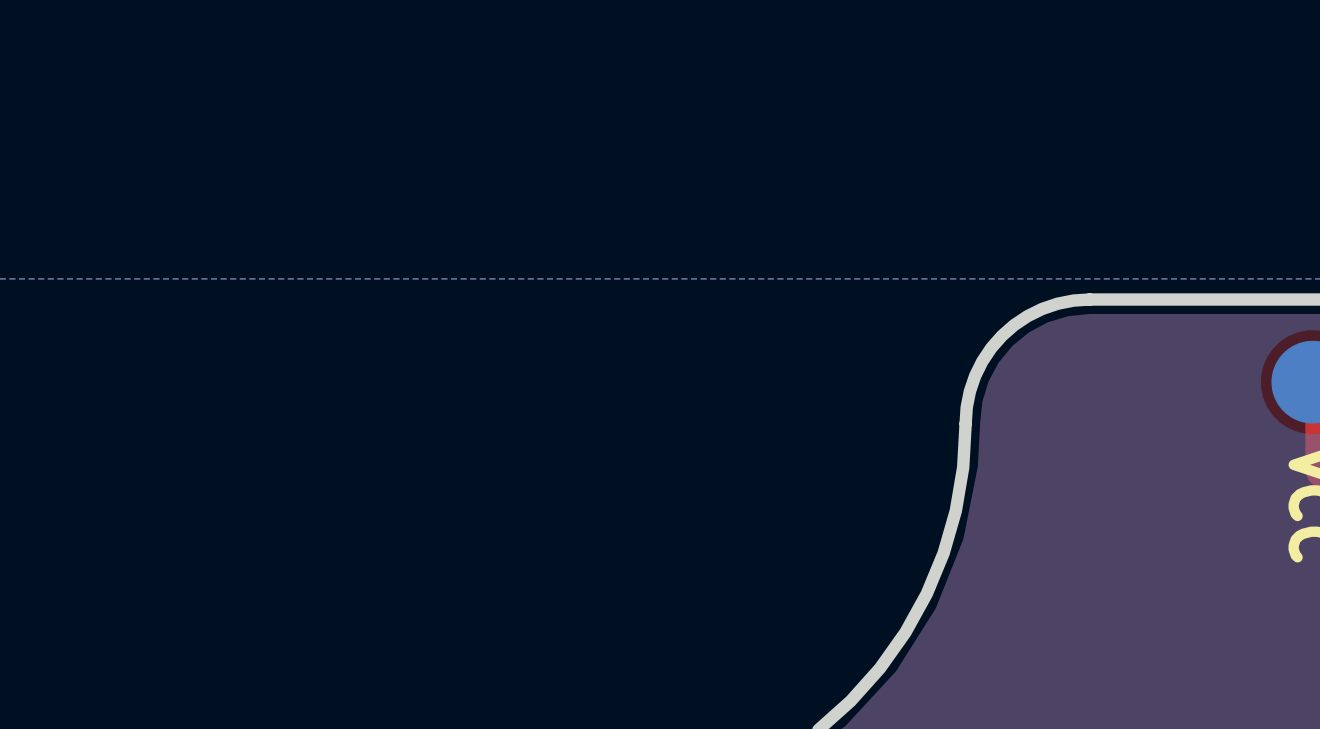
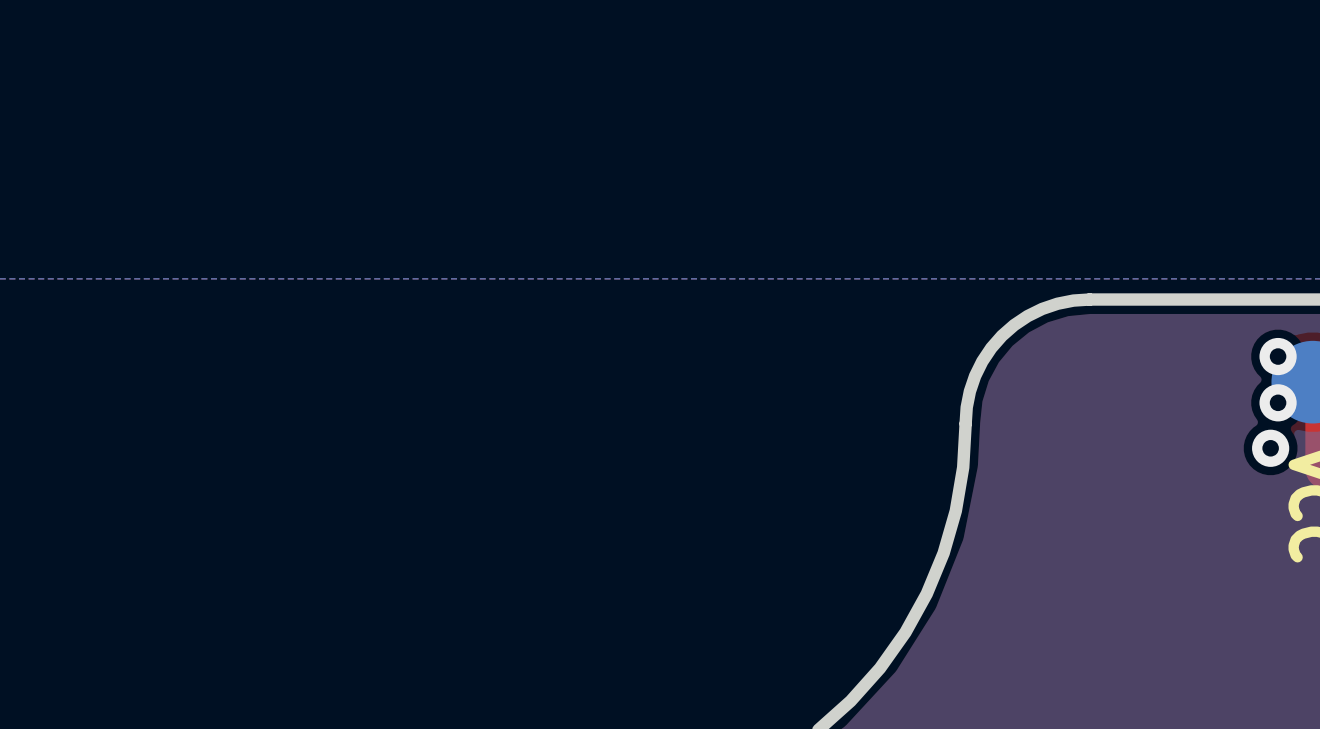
via: none -> (1278, 356)
via: none -> (1278, 402)
via: none -> (1270, 448)

